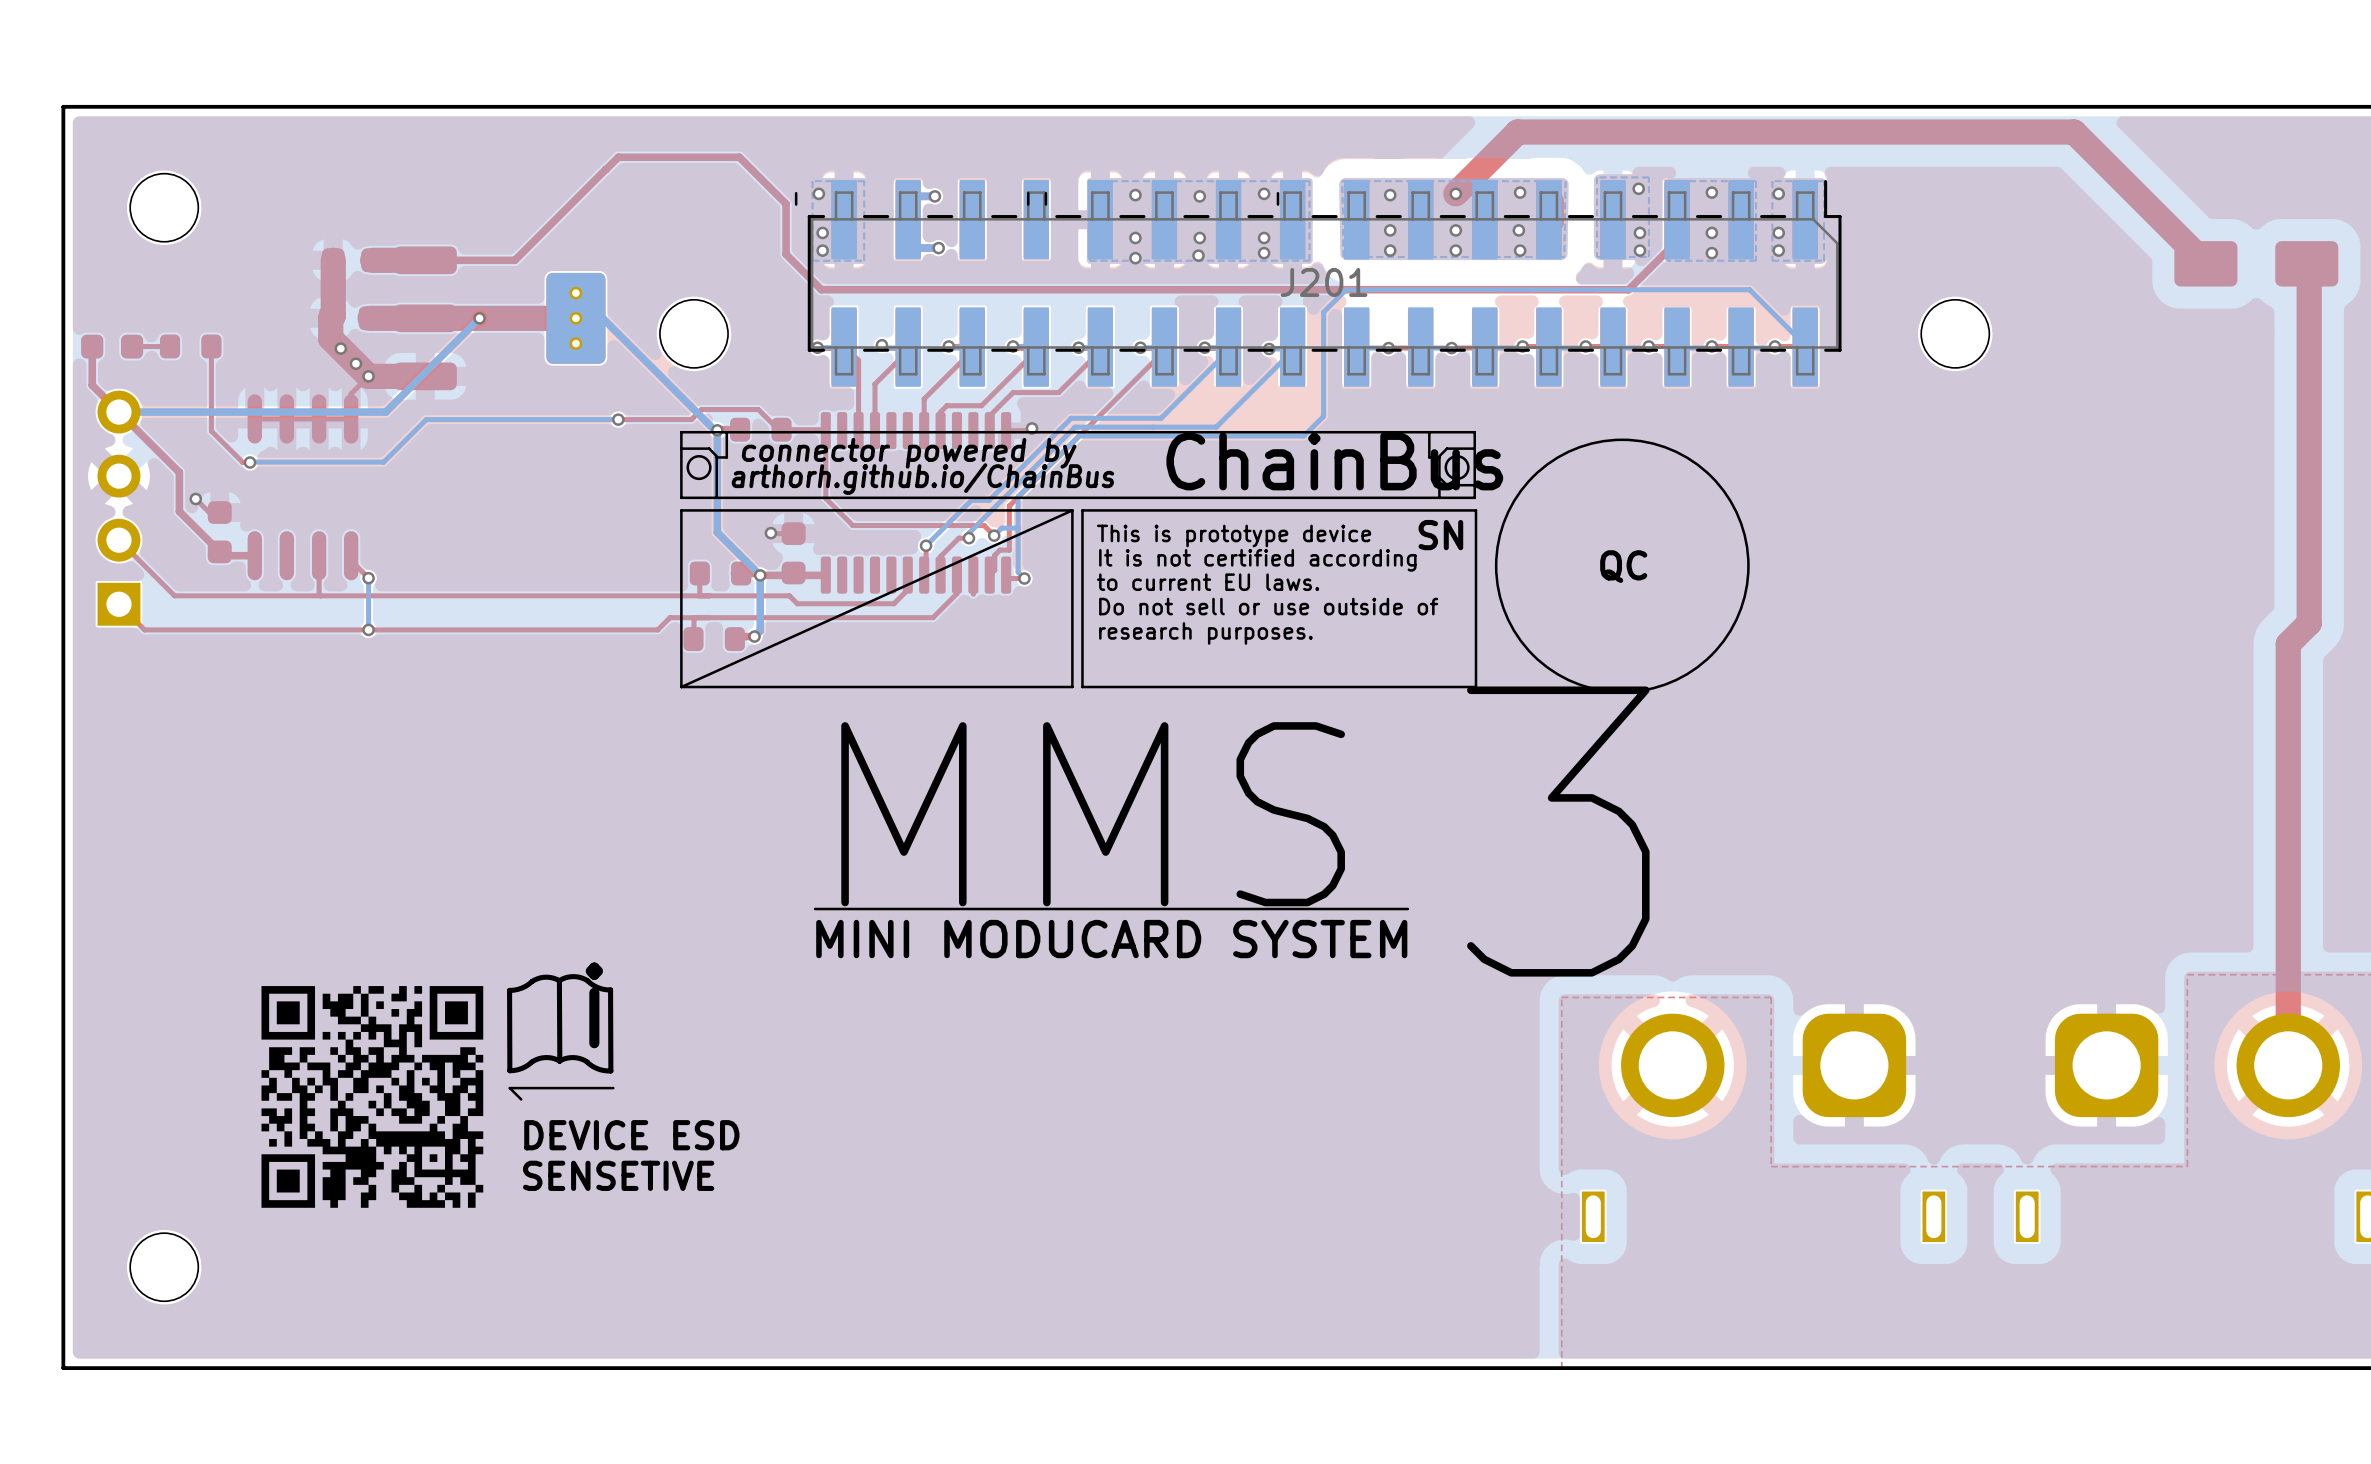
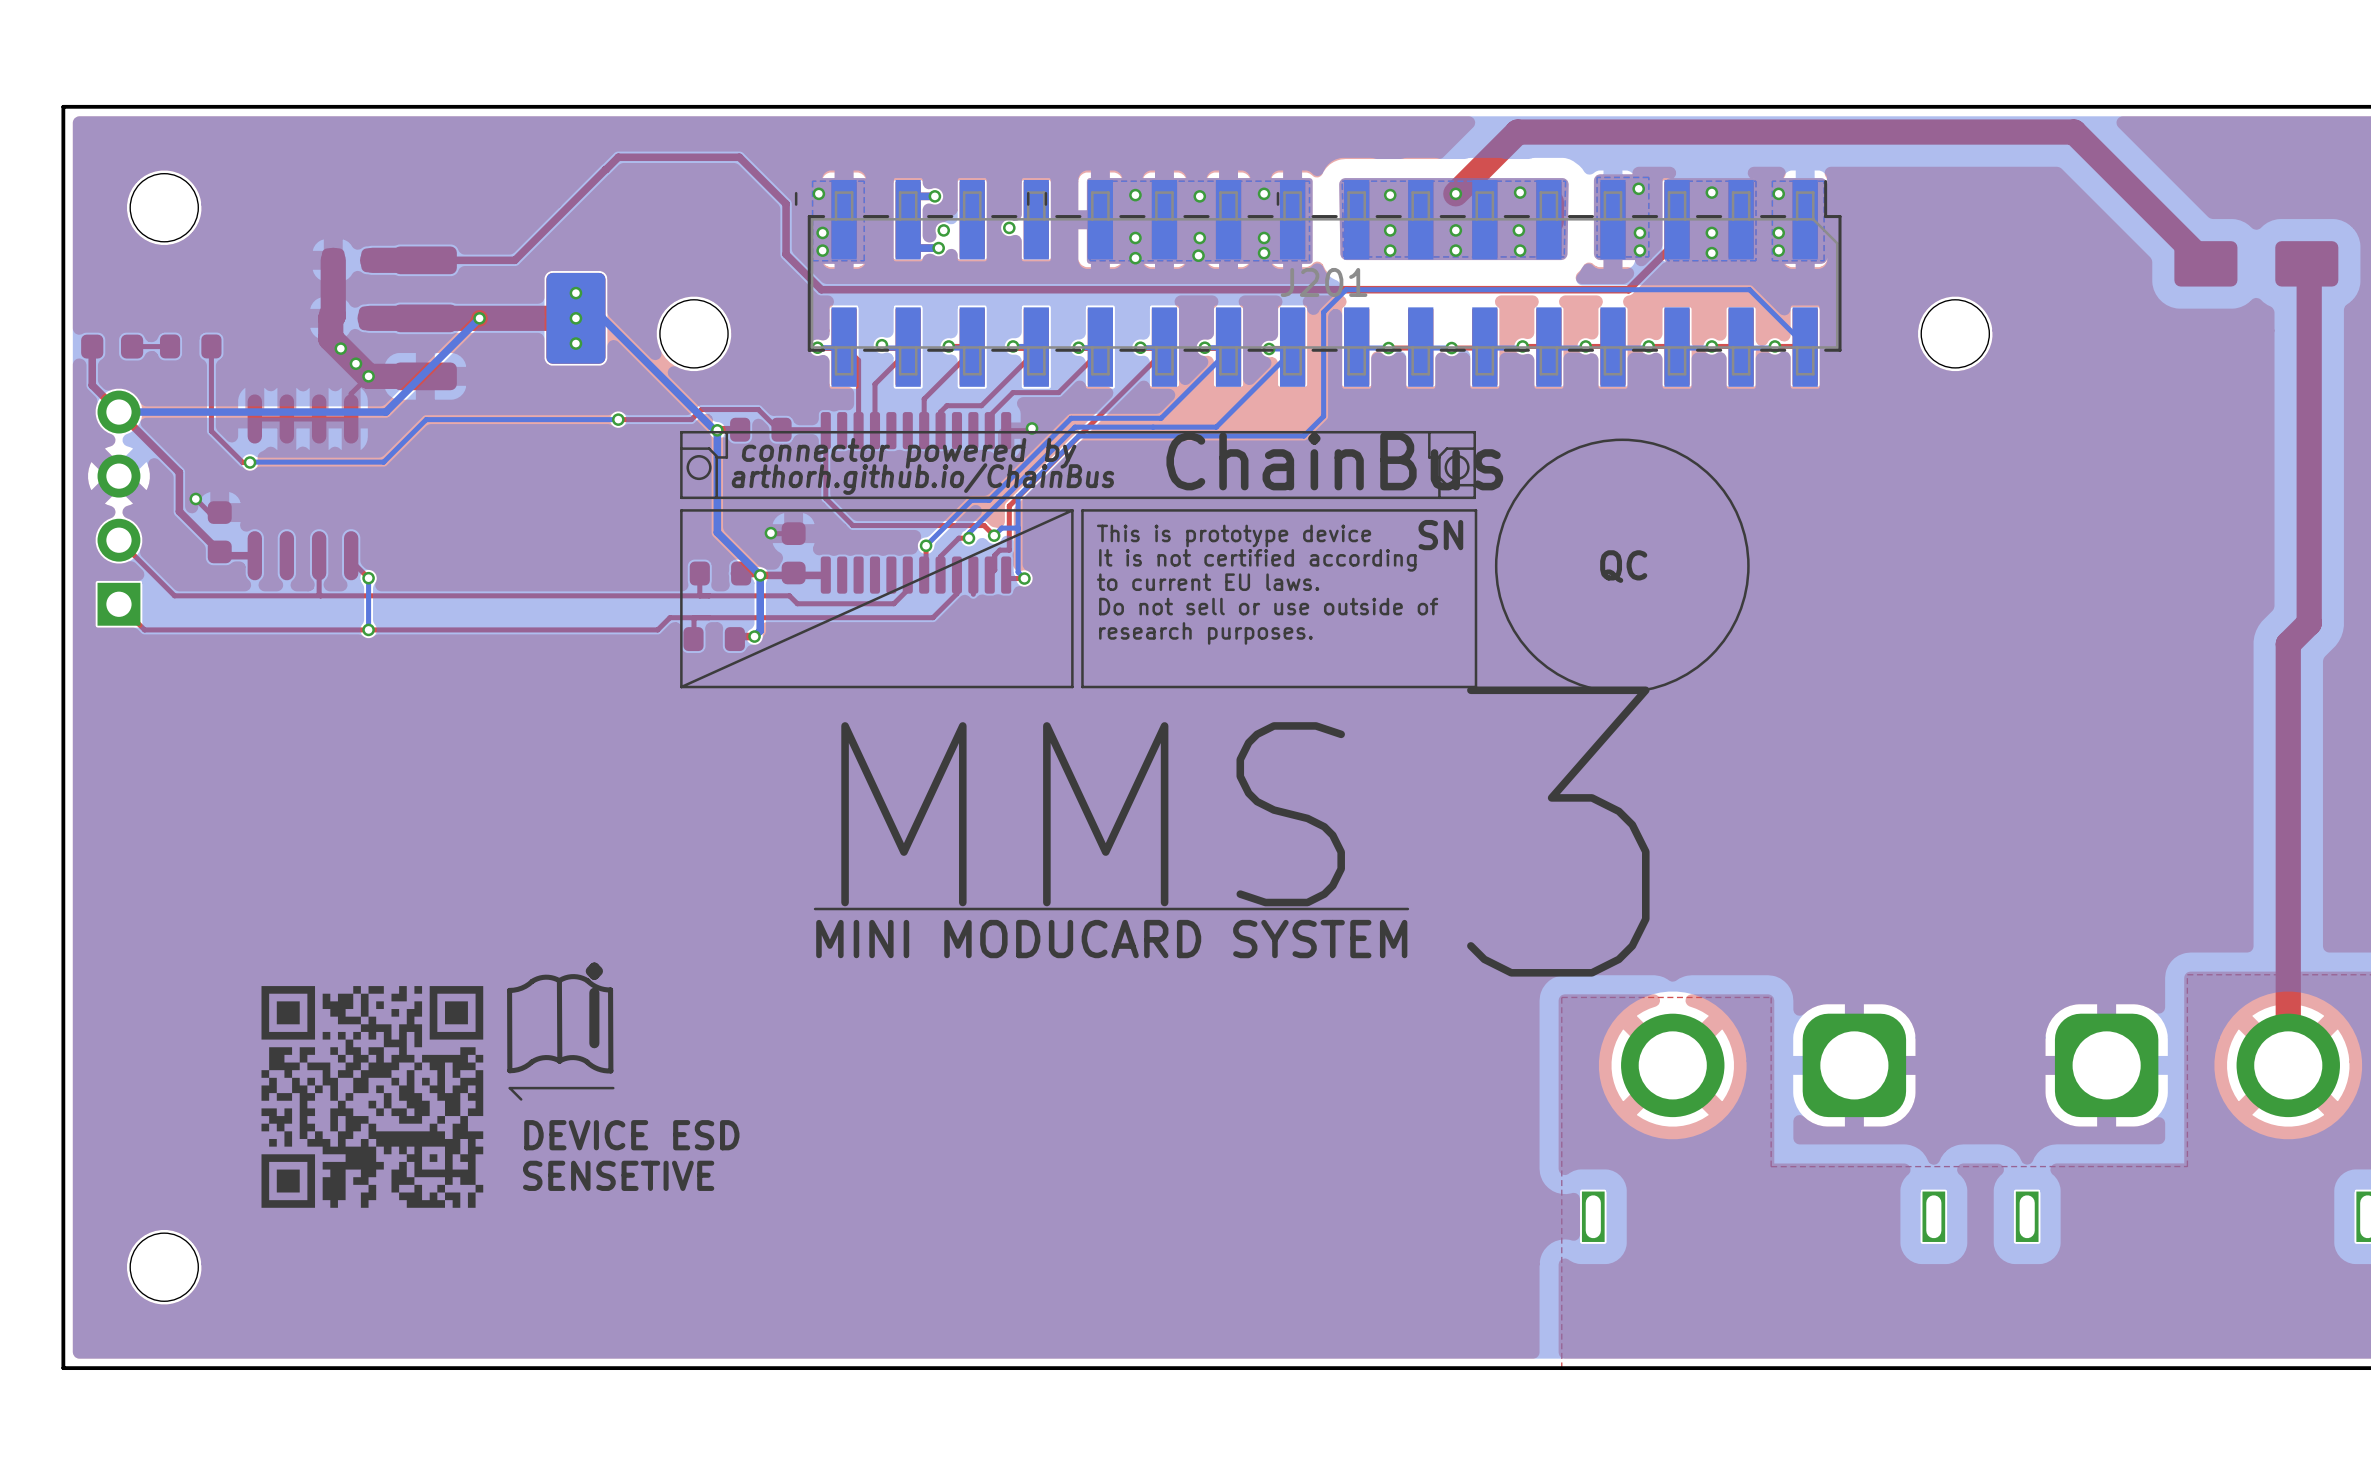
via: none -> (1009, 227)
via: none -> (943, 230)

